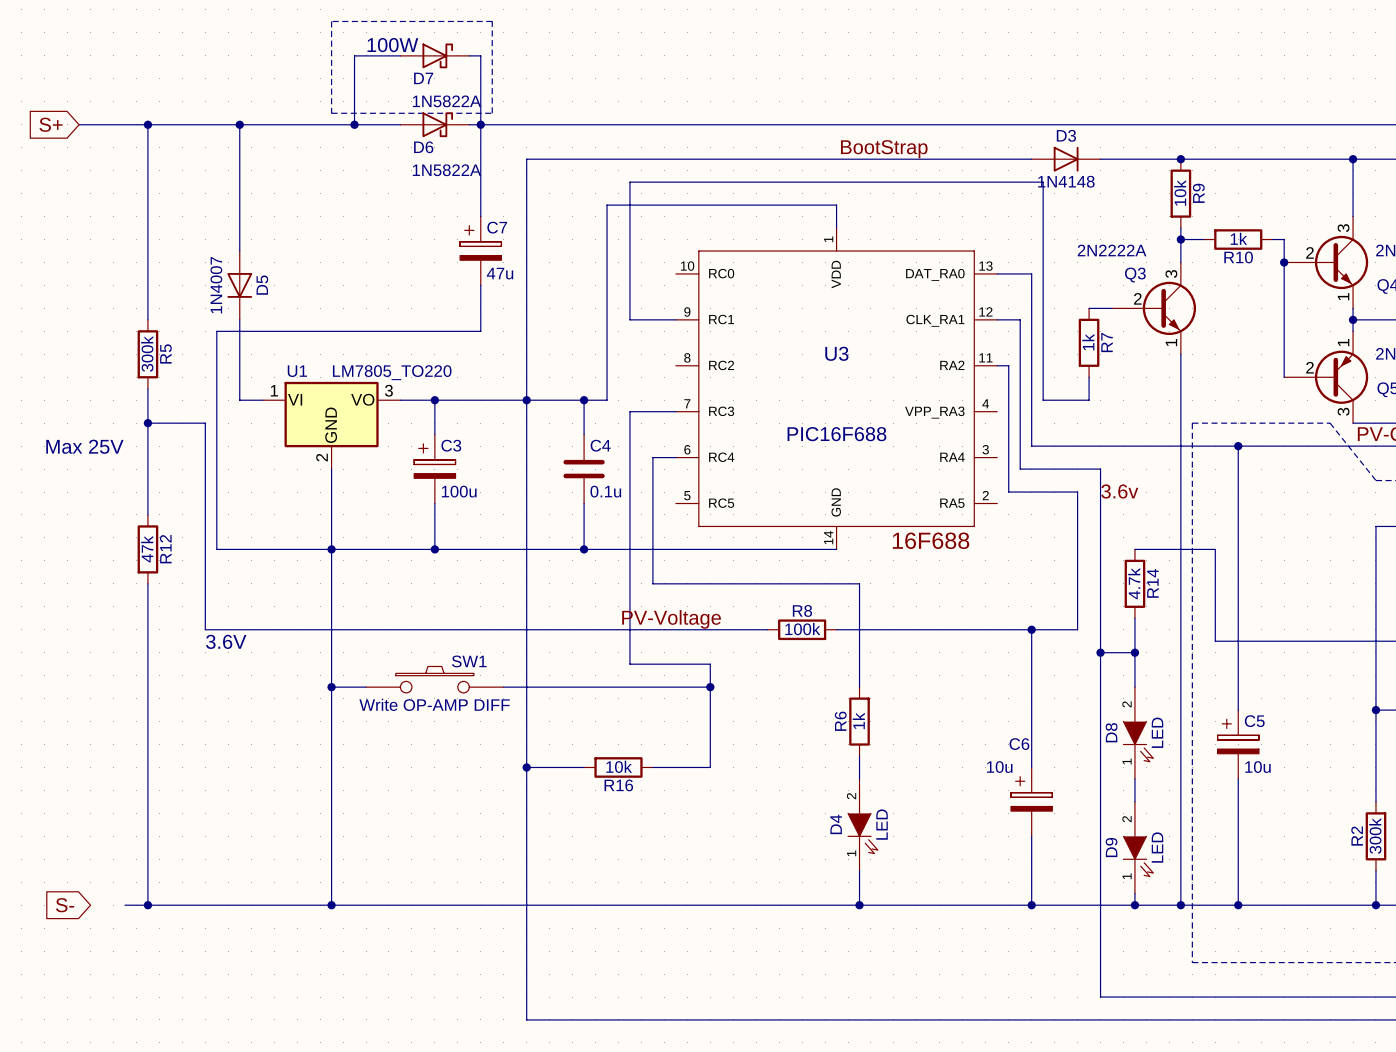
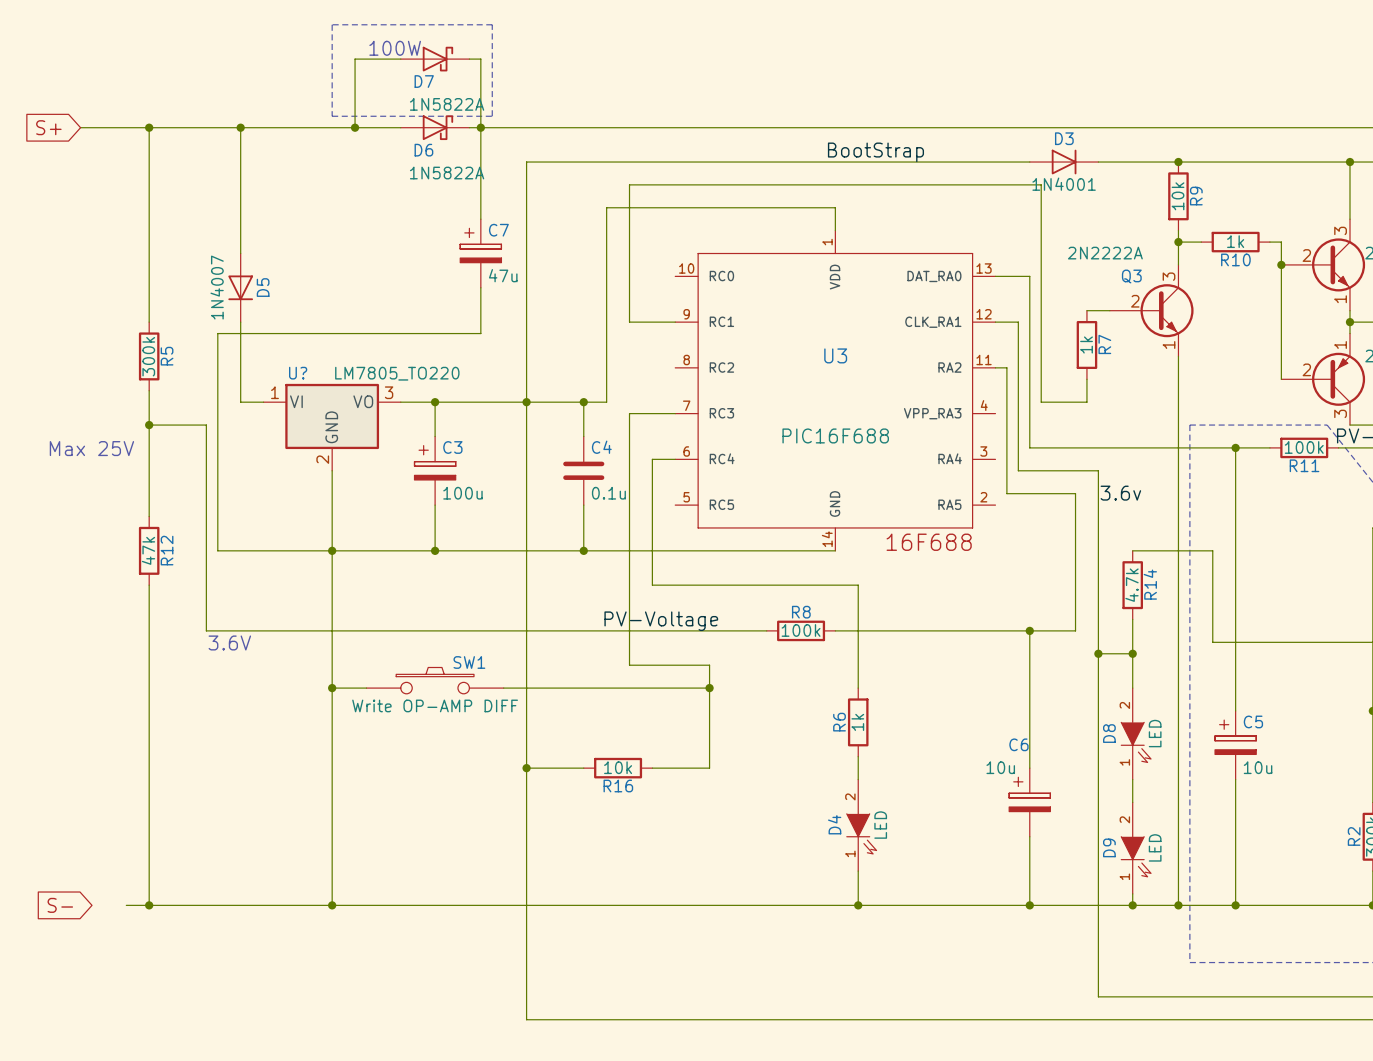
D3 value: 1N4148 (1066, 181) -> 1N4001 (1064, 184)
U1 name: U1 (297, 371) -> U? (298, 373)
R11: none -> 100k (1304, 447)

